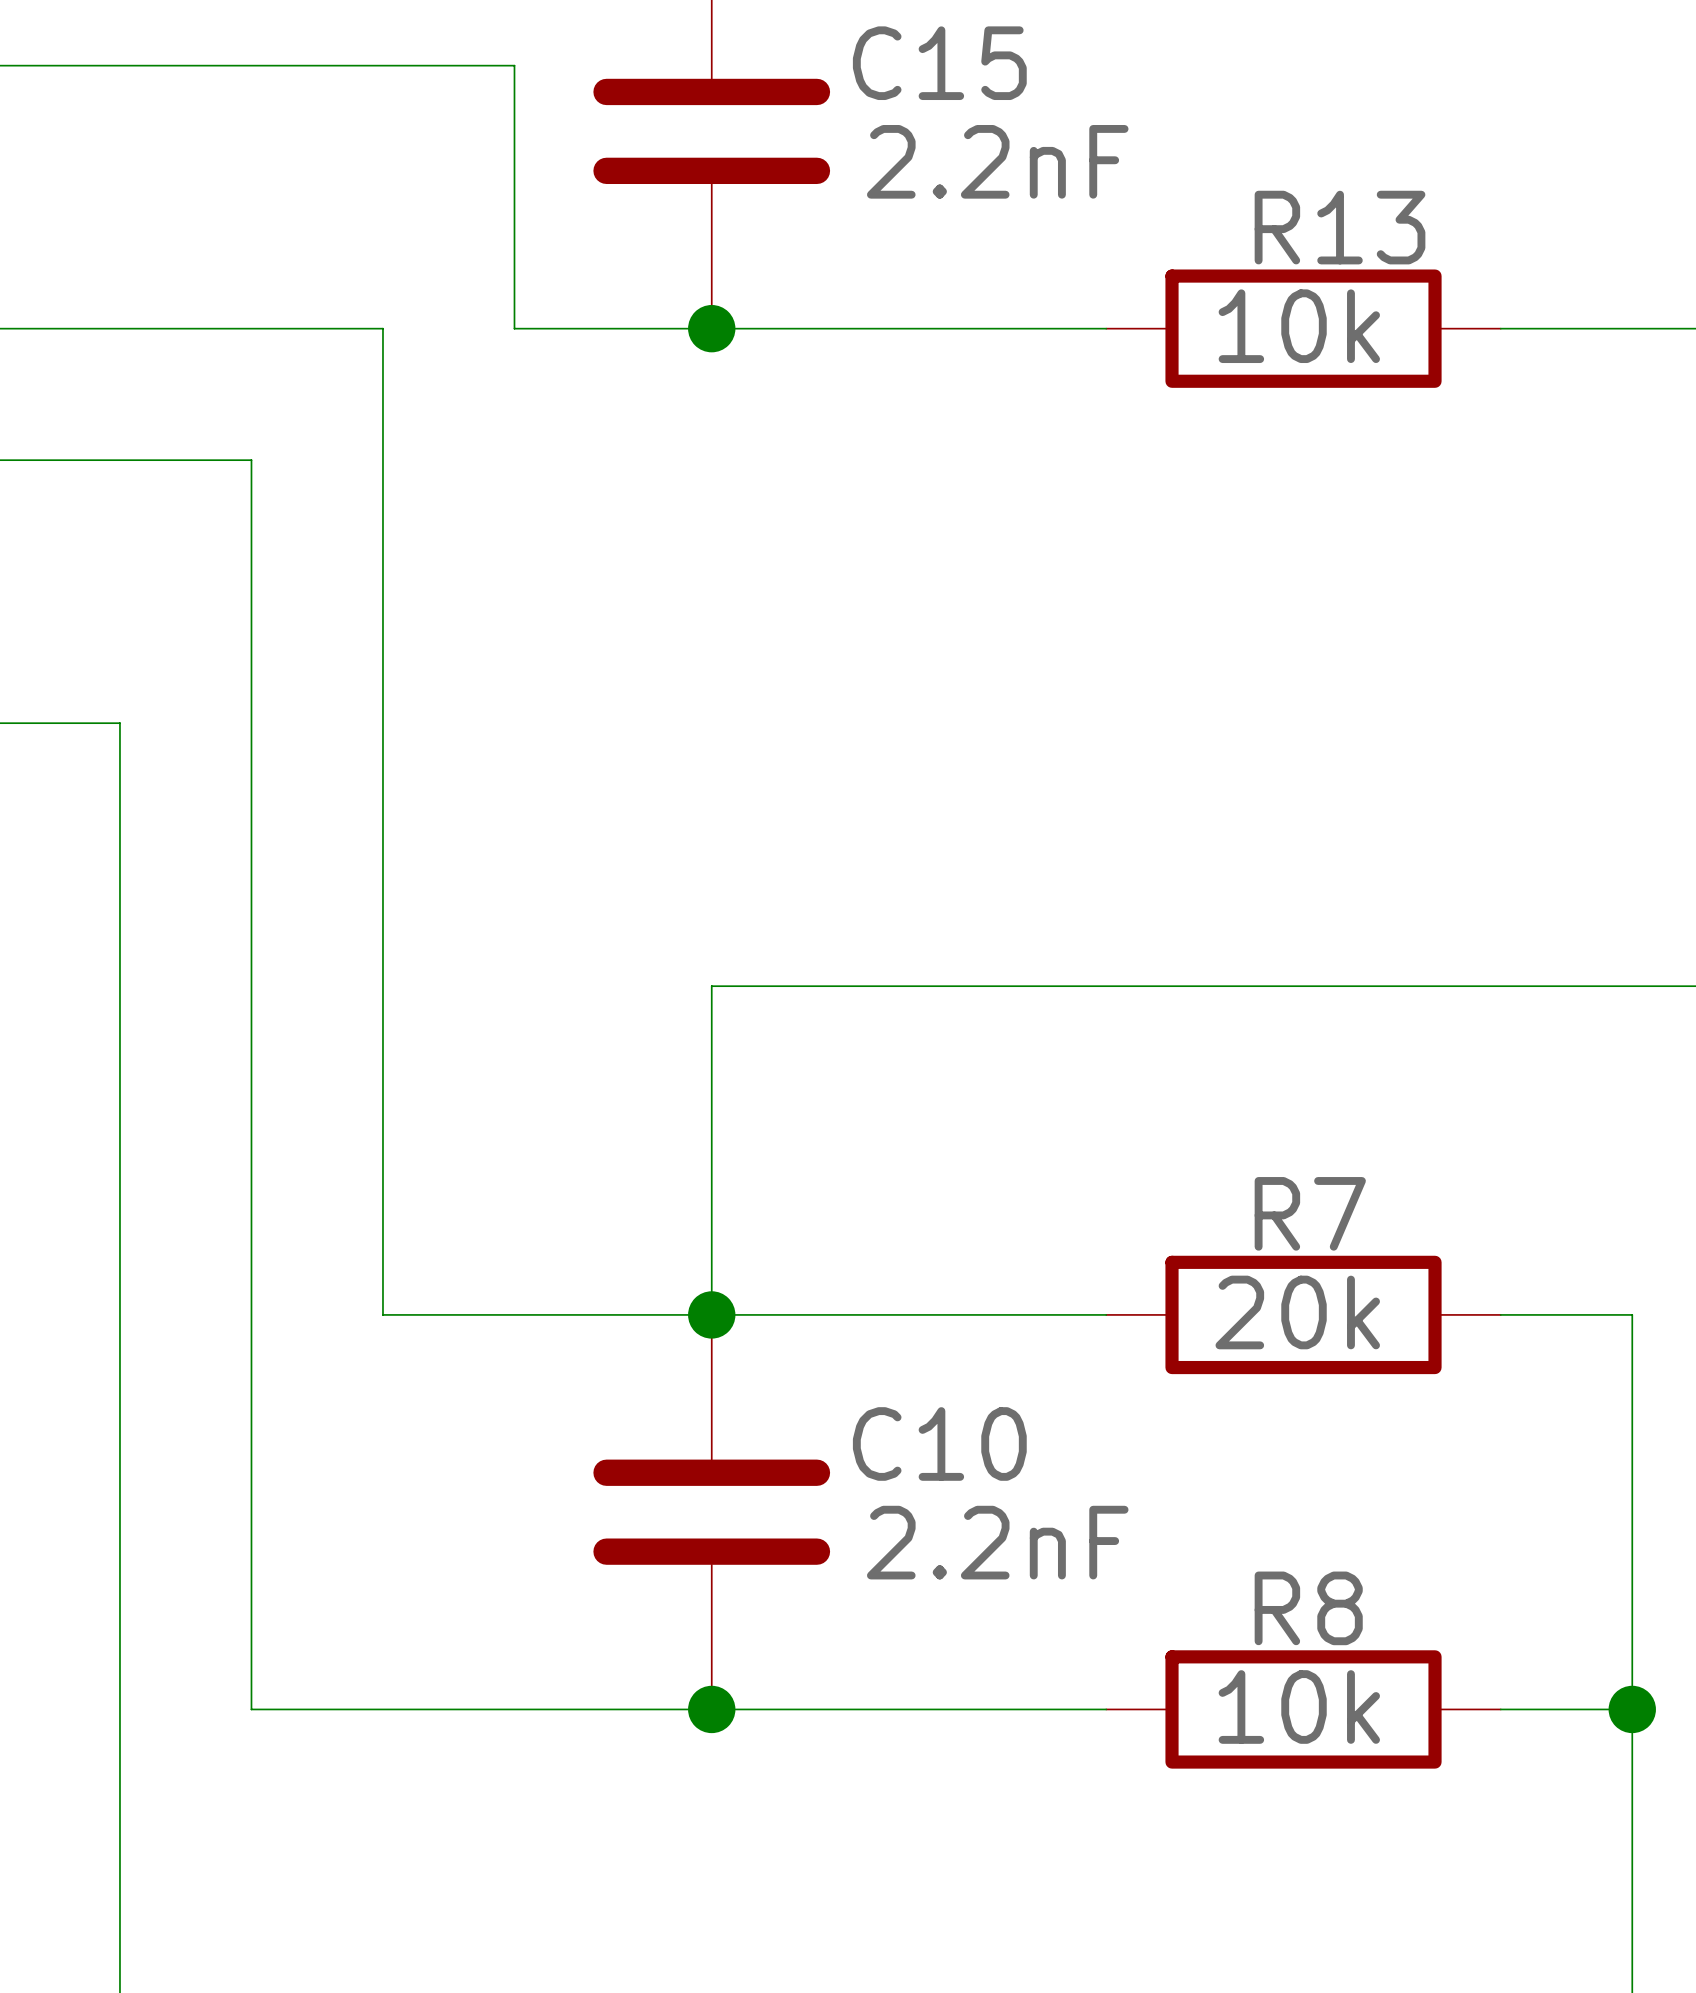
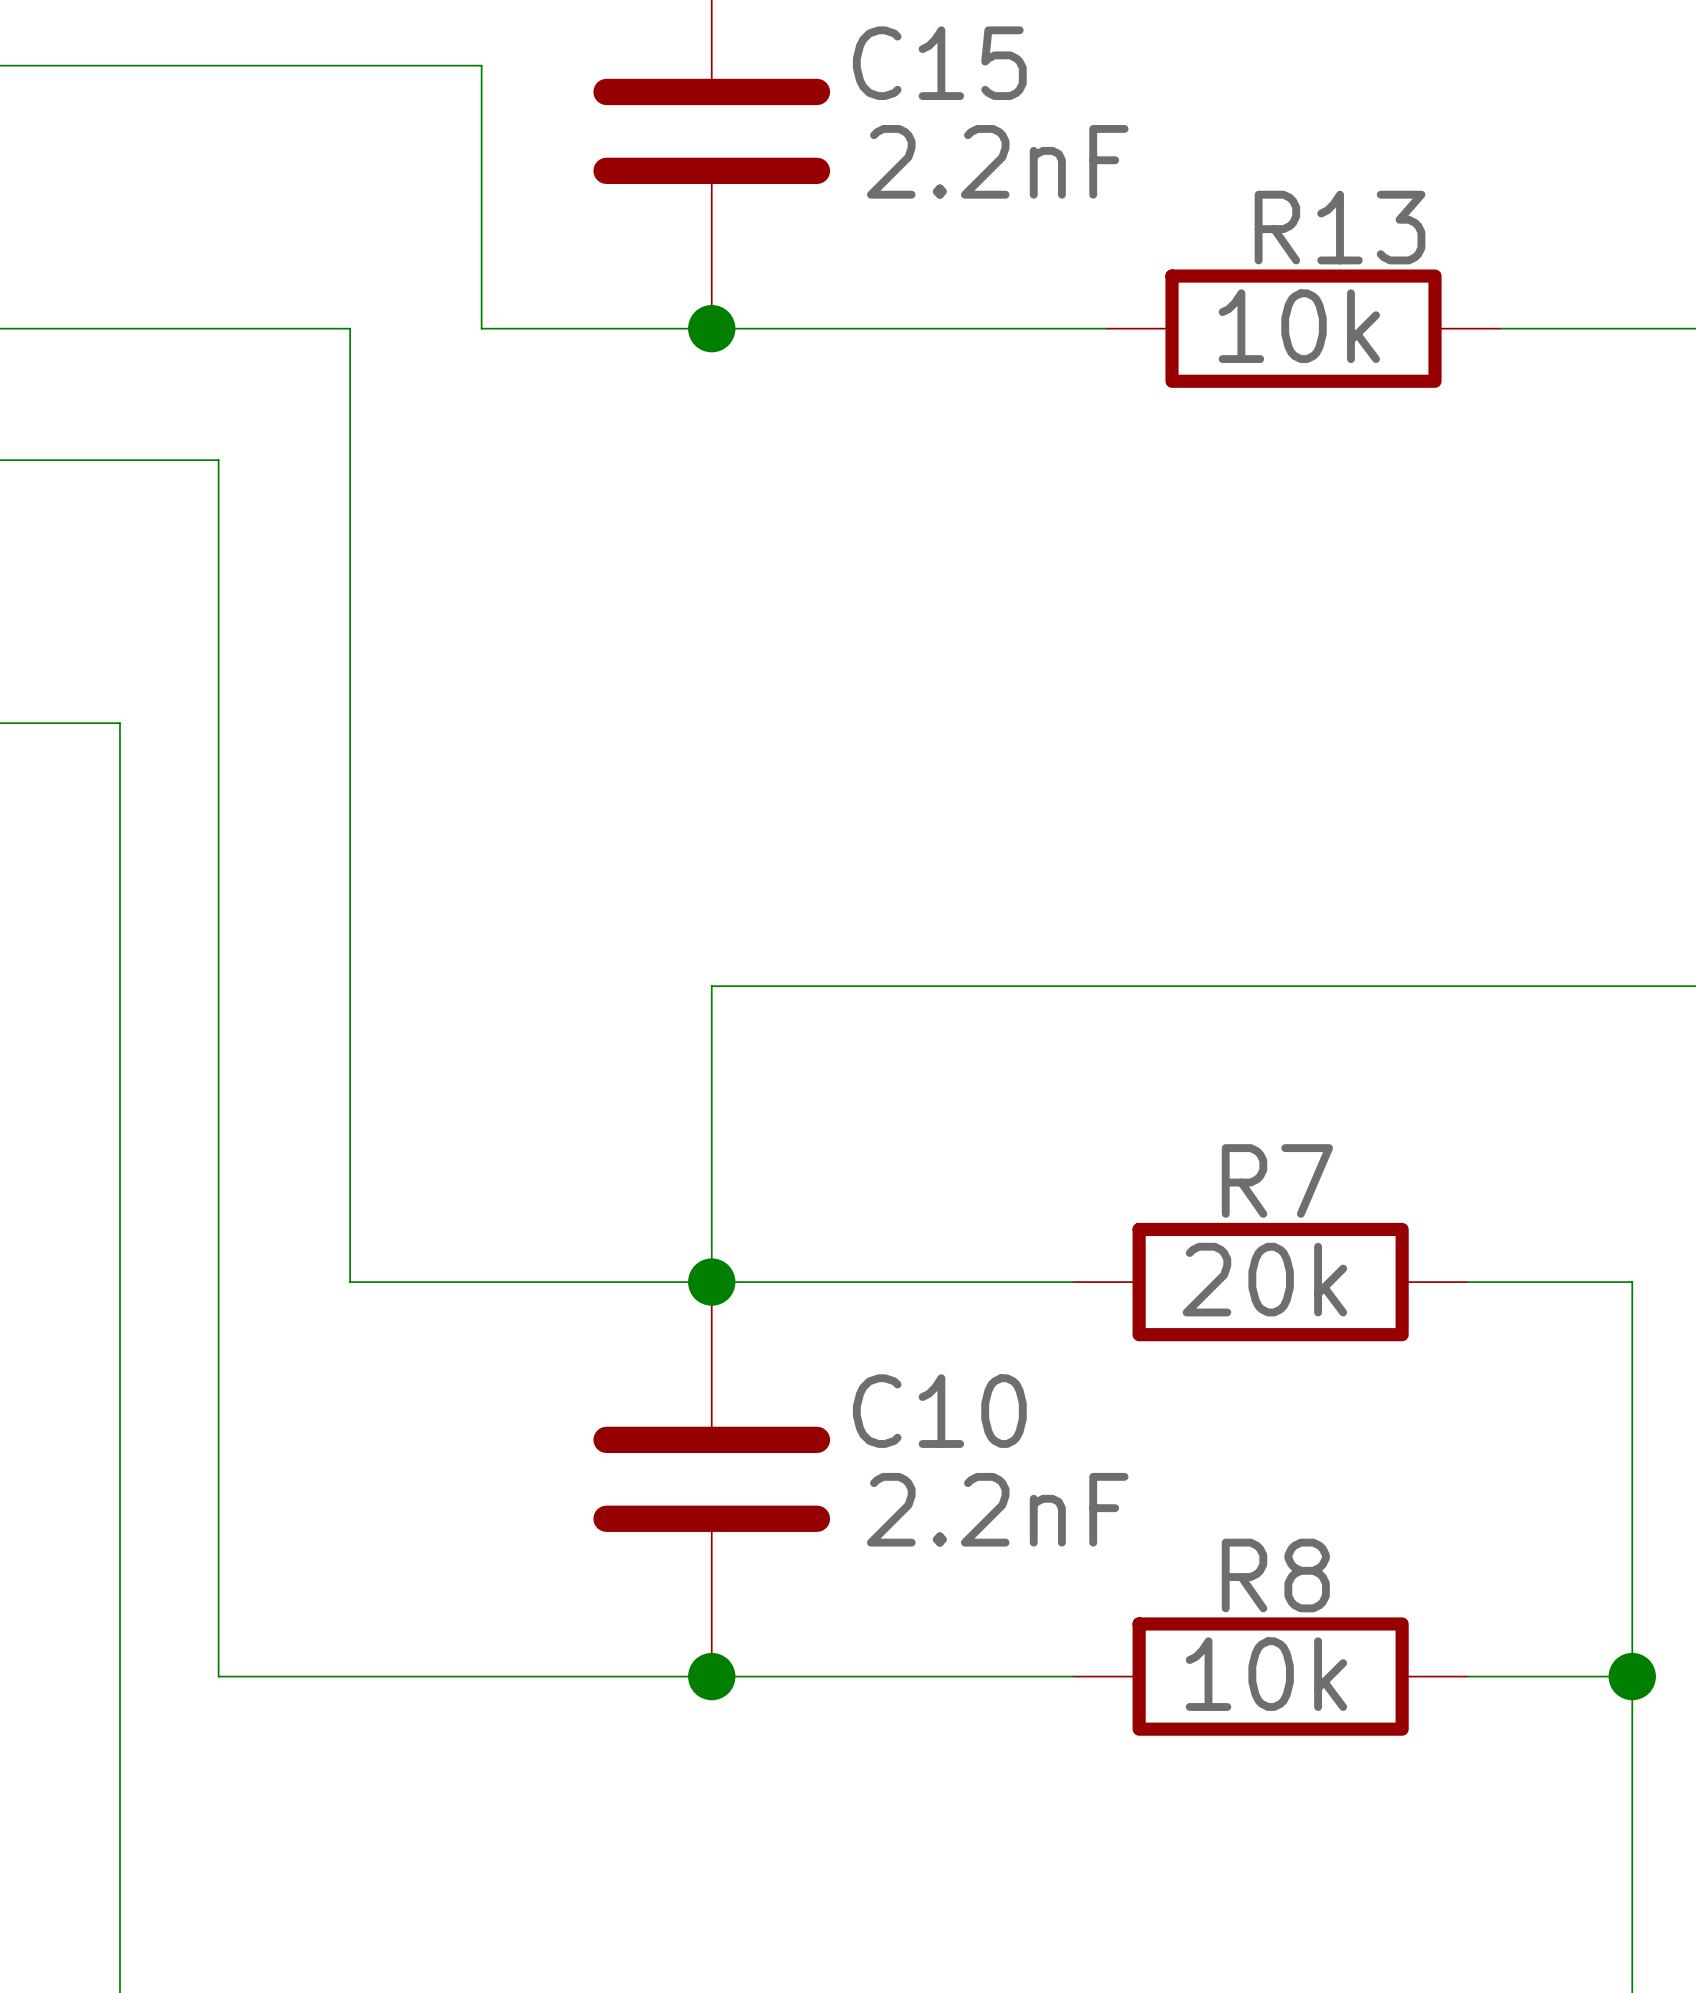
wire: (481, 65) (514, 65) (514, 328) -> (481, 65) (481, 328) (514, 328)
wire: (350, 328) (382, 328) (382, 1314) (1106, 1314) -> (350, 328) (350, 1282) (1073, 1282)
wire: (218, 460) (251, 460) (251, 1709) (1106, 1709) -> (218, 460) (218, 1676) (1073, 1676)
junction position: (711, 1314) -> (711, 1282)
R7 position: (1303, 1314) -> (1270, 1282)
wire: (1500, 1314) (1632, 1314) -> (1467, 1282) (1632, 1282) (1632, 1314)
C10 position: (711, 1512) -> (711, 1479)
wire: none -> (1467, 1676) (1632, 1676)
junction position: (711, 1709) -> (711, 1676)
R8 position: (1303, 1709) -> (1270, 1676)
wire: (1500, 1709) (1632, 1709) -> none
junction position: (1632, 1709) -> (1632, 1676)

